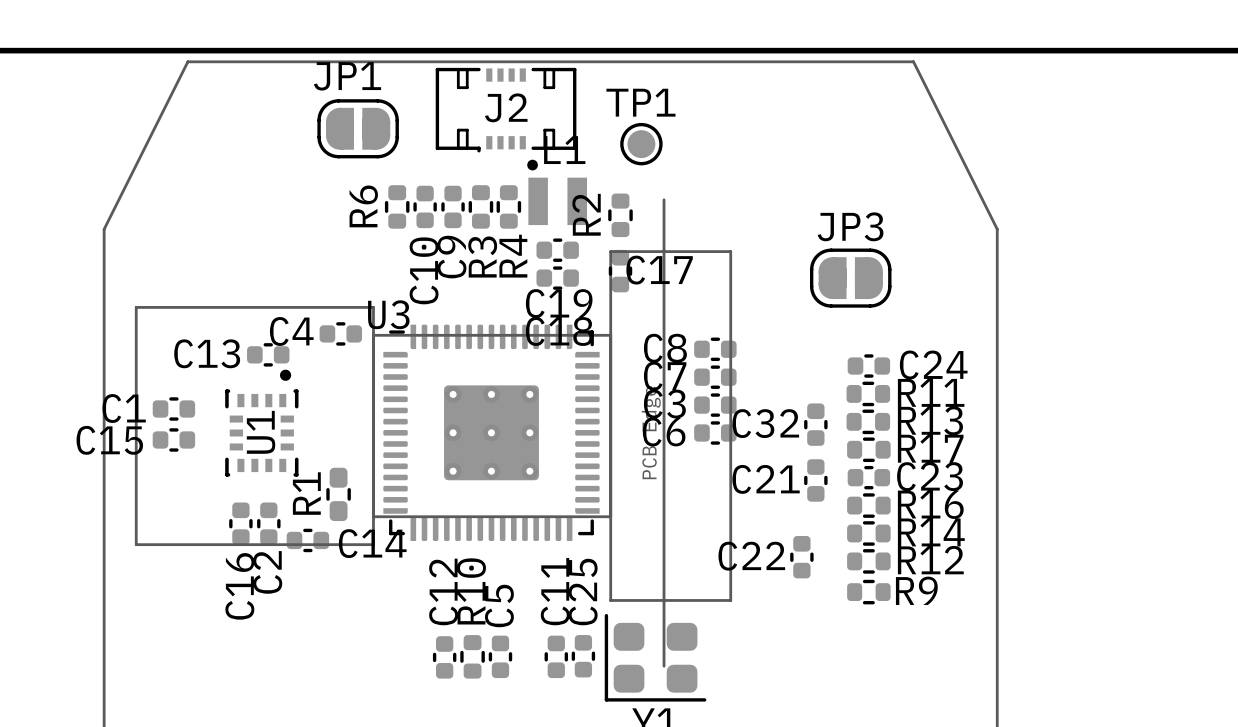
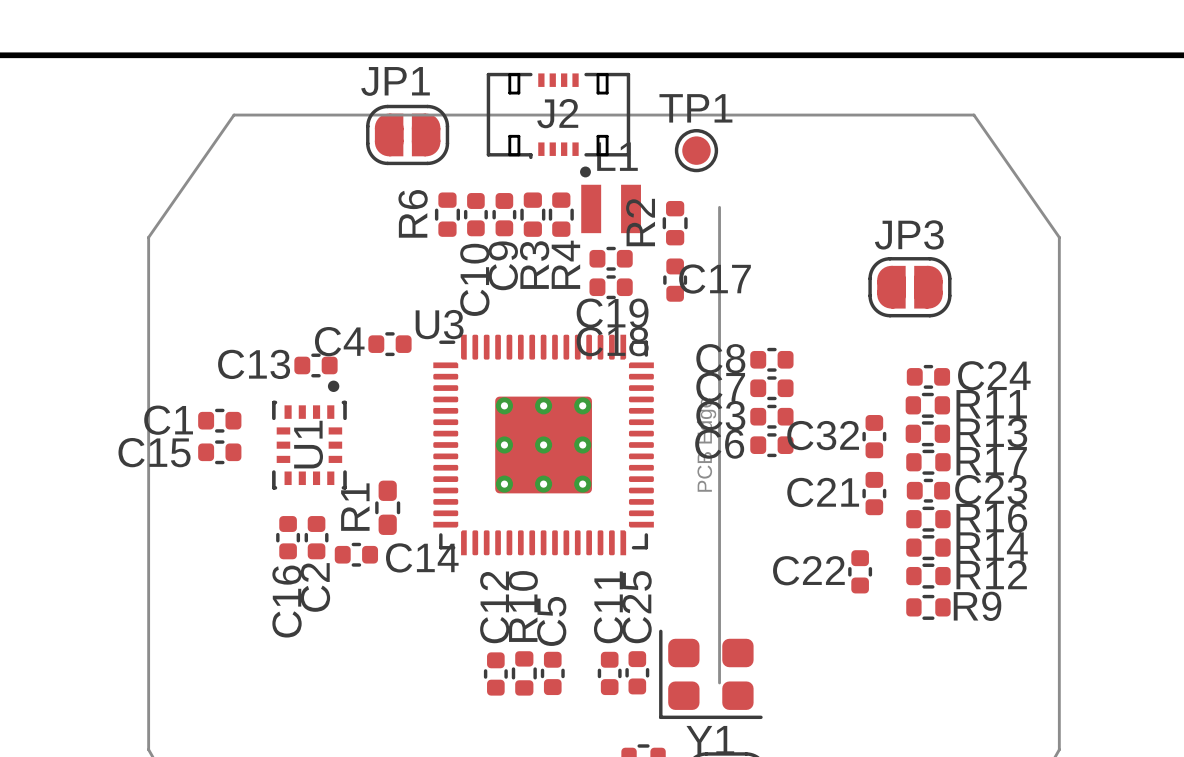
line: (104, 229) (187, 61) (913, 61) (997, 229) -> (148, 237) (234, 115) (973, 115) (1059, 237)
line: (610, 251) (730, 251) (730, 600) (610, 600) (610, 251) -> none
line: (136, 307) (373, 307) (373, 544) (136, 544) (136, 307) -> none
line: (373, 335) (610, 335) -> none
line: (373, 516) (610, 516) -> none

